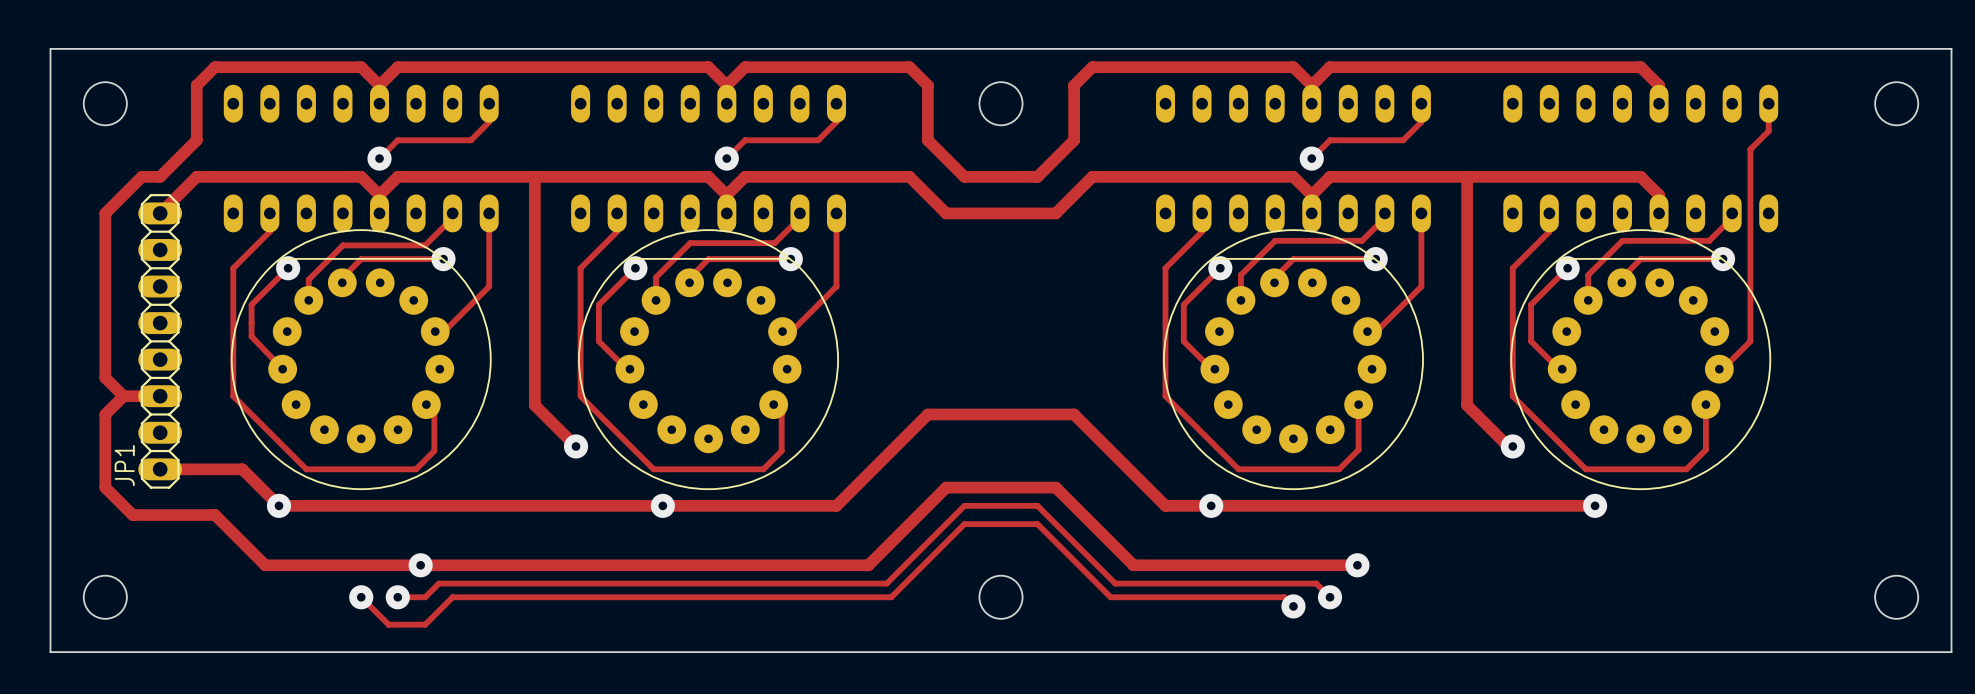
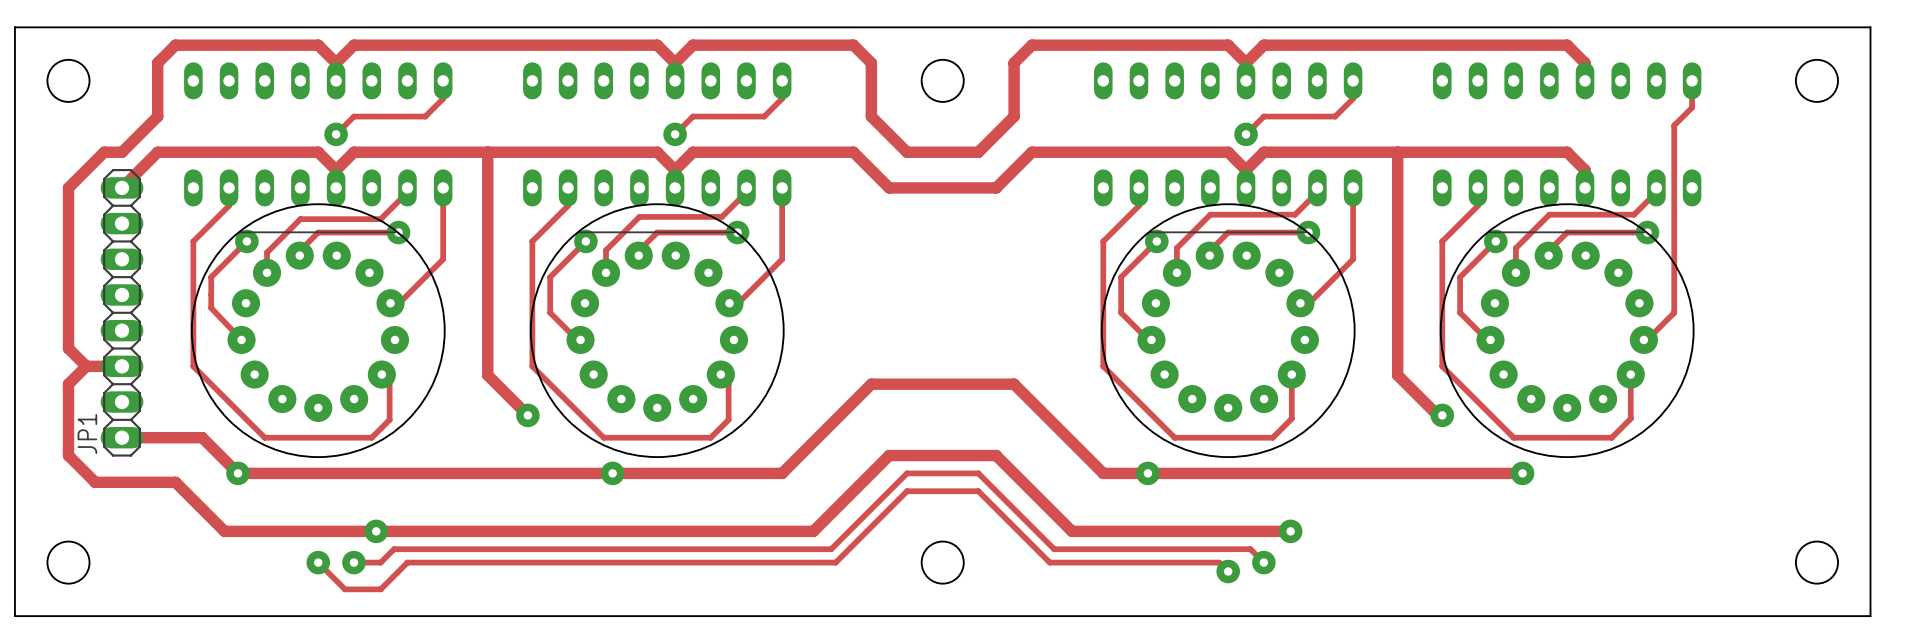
part footprint: [230, 229, 492, 491] -> [190, 203, 446, 458]
part footprint: [578, 229, 839, 491] -> [529, 203, 785, 458]
part footprint: [1163, 229, 1424, 491] -> [1100, 203, 1356, 458]
part footprint: [1510, 229, 1772, 491] -> [1439, 203, 1695, 458]

